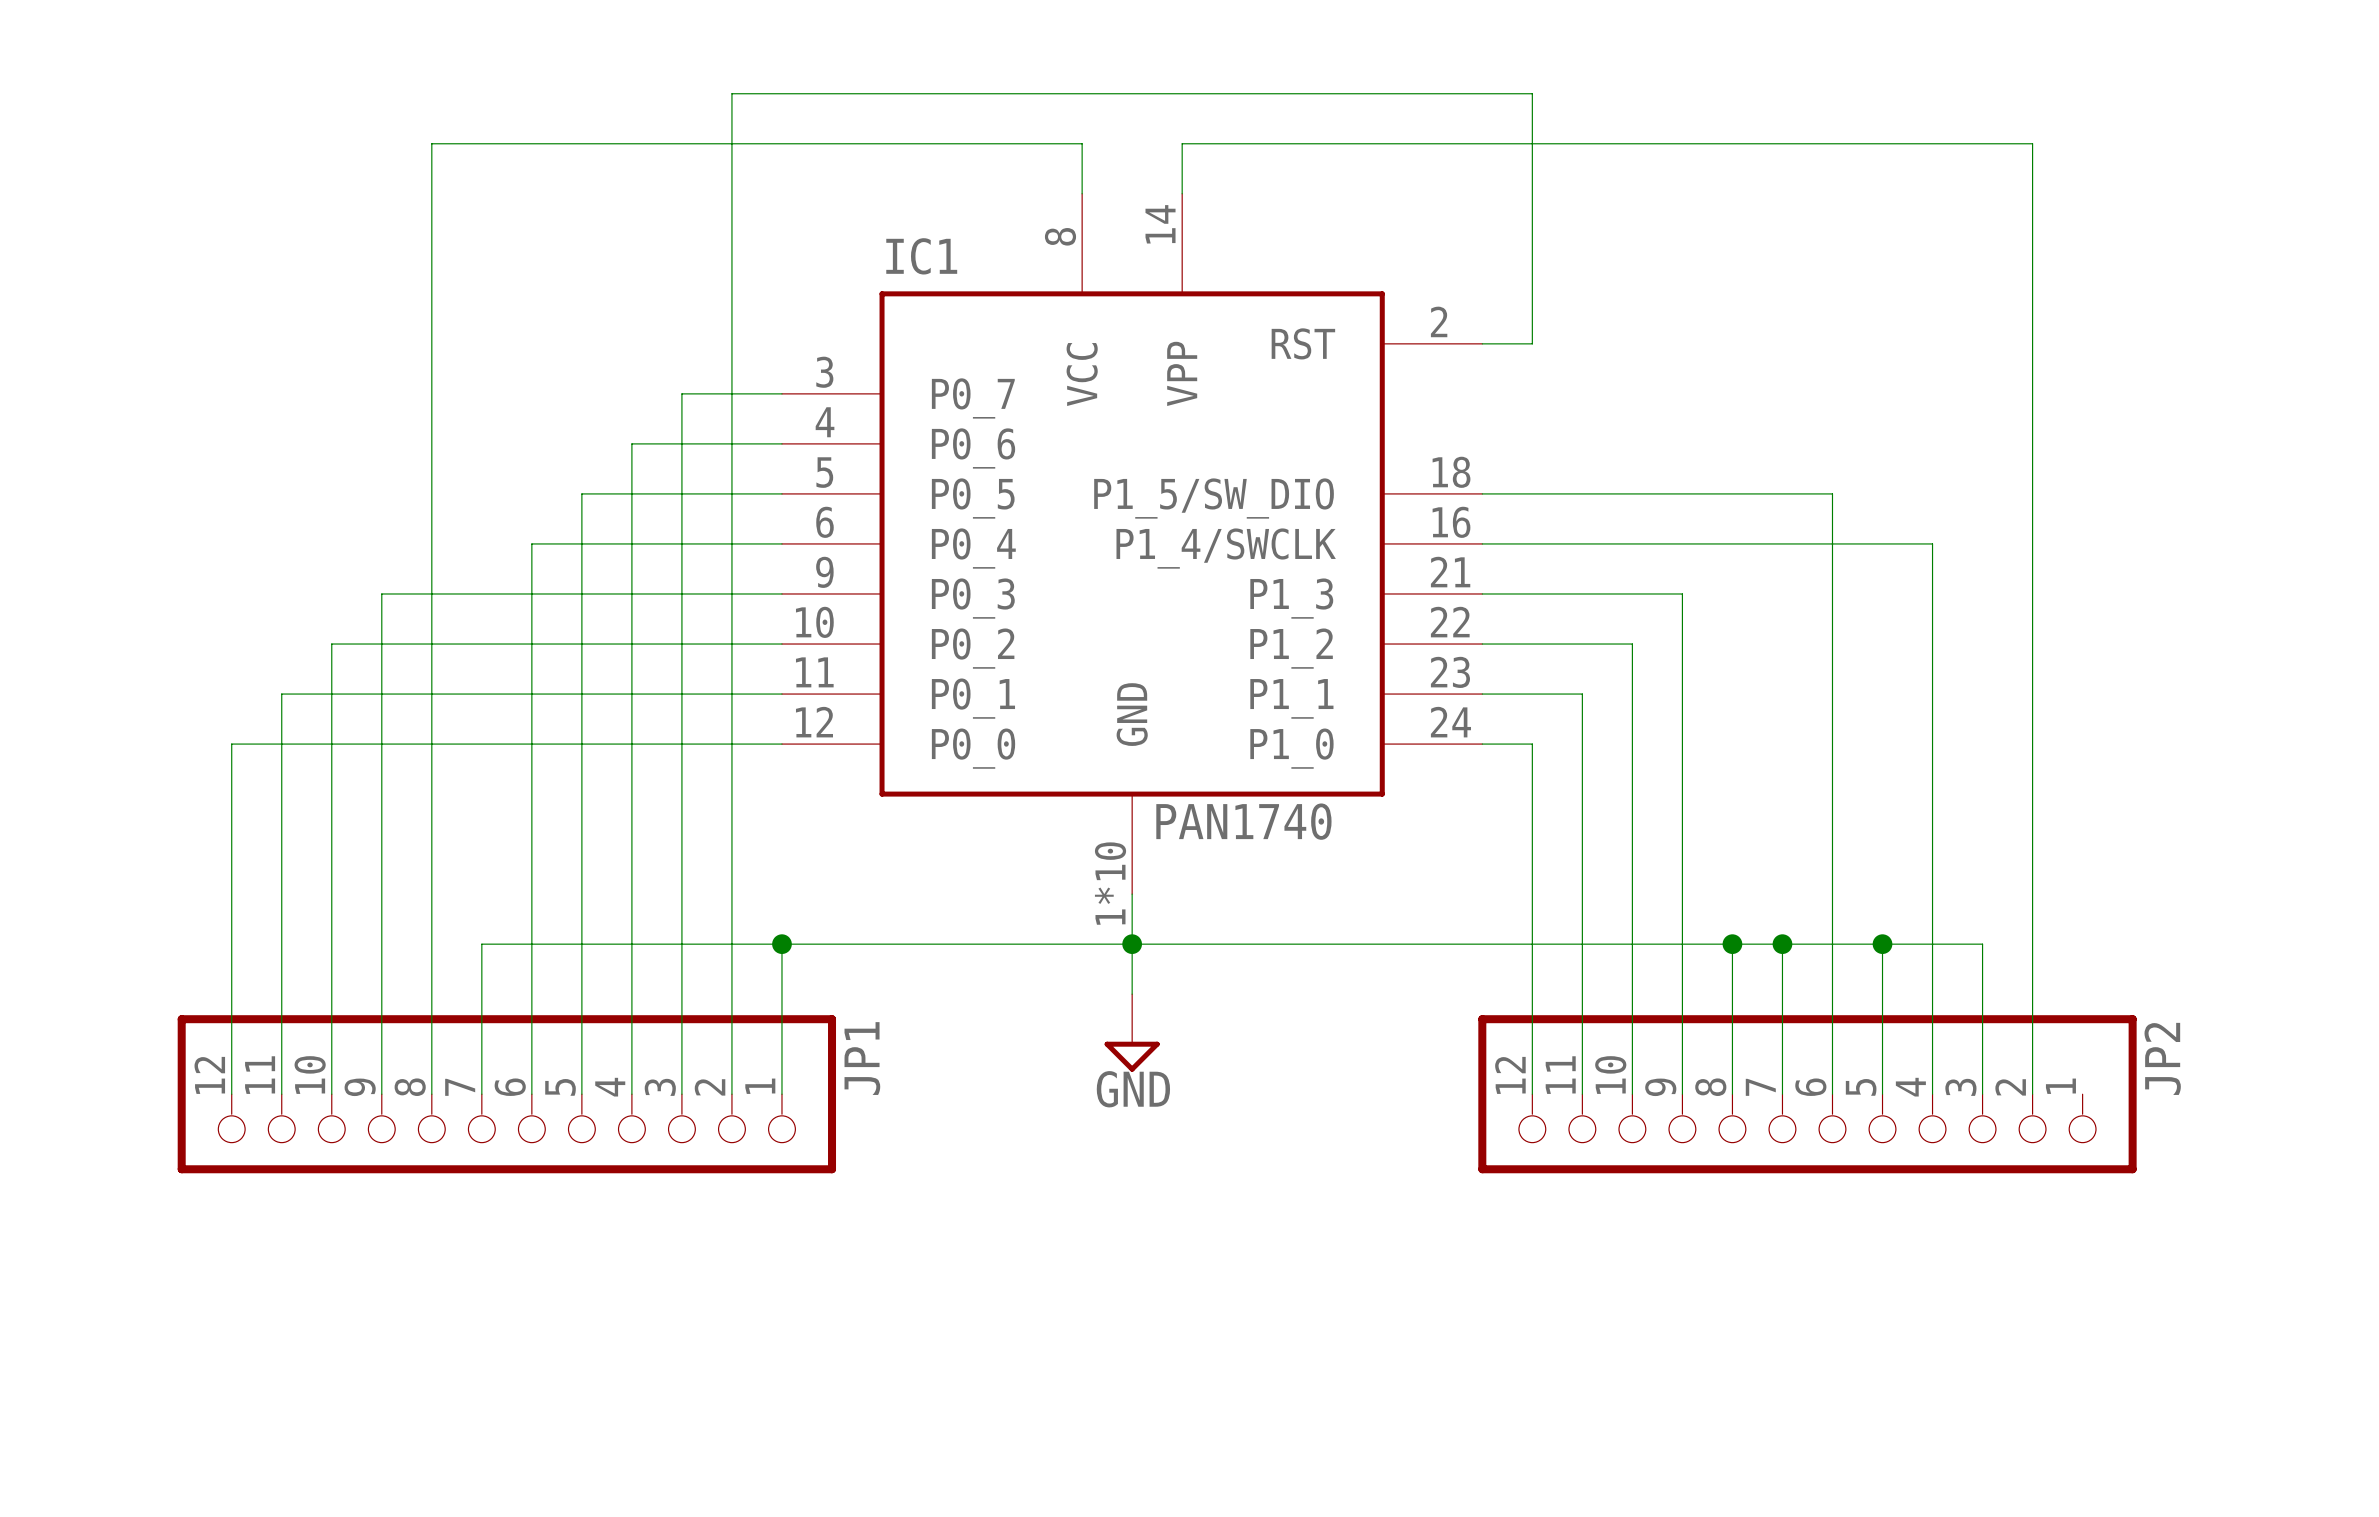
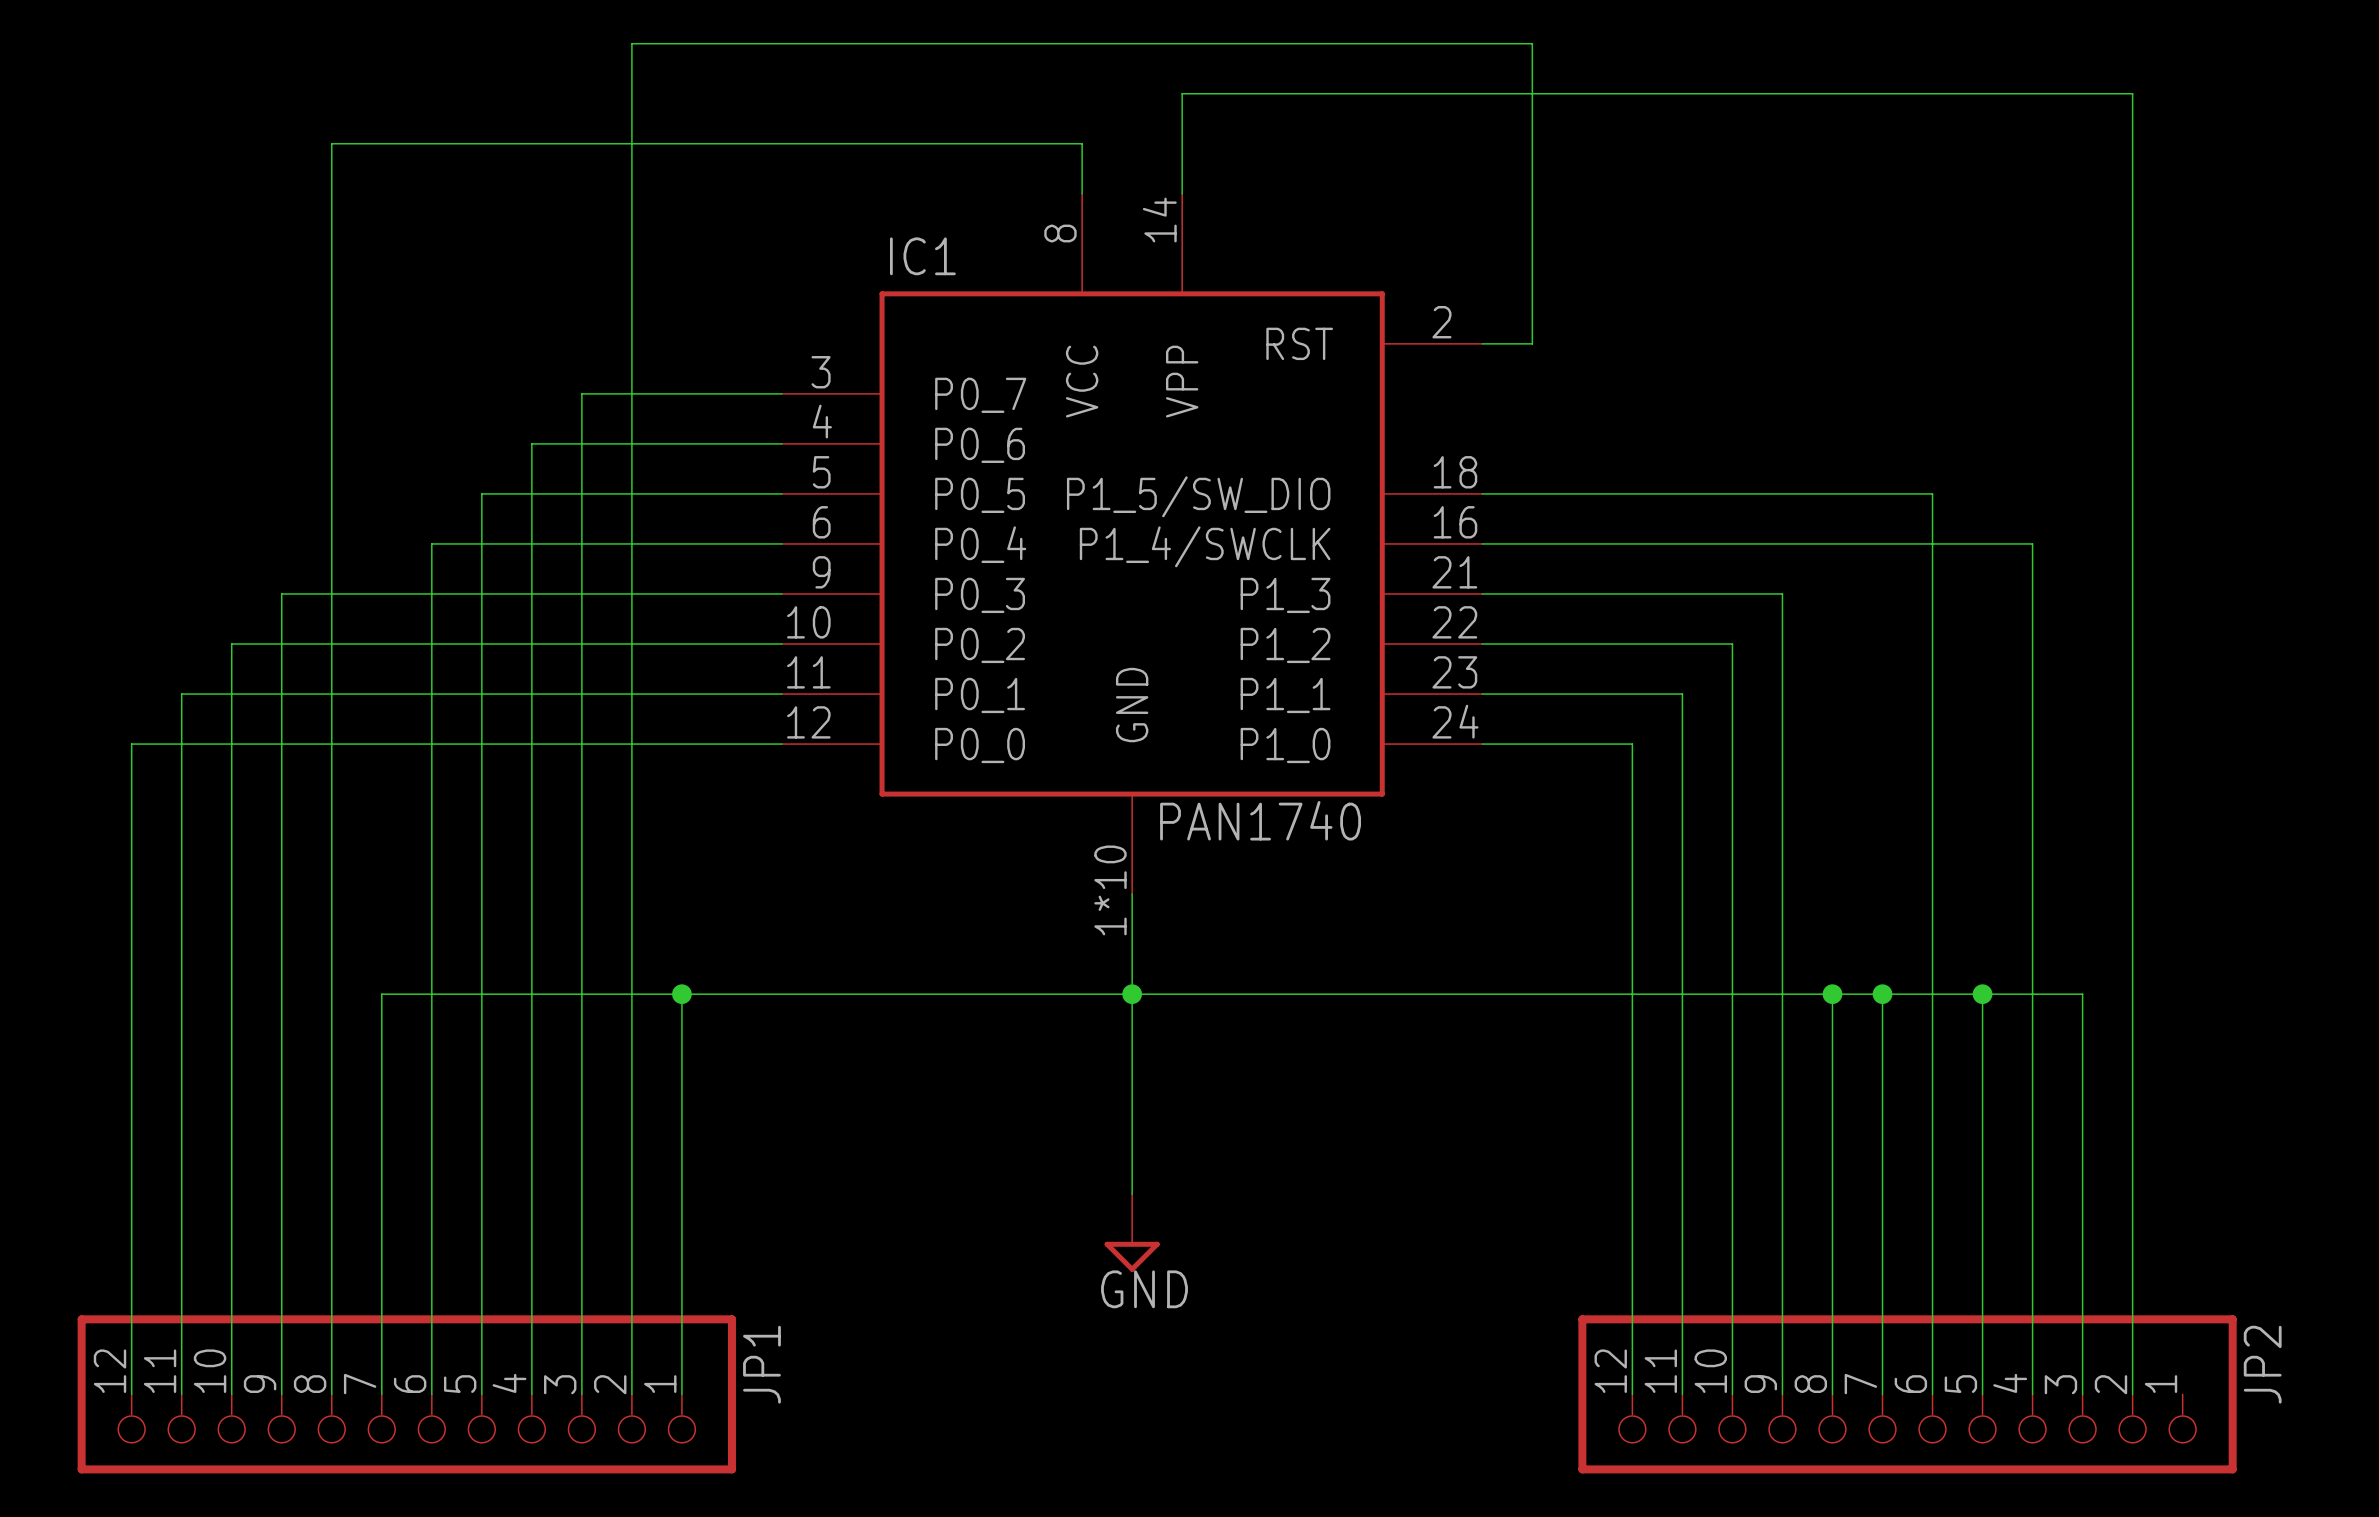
wire: (1182, 93) (731, 93) (731, 1094) -> none
wire: (431, 143) (431, 543) -> (431, 143) (331, 143) (331, 644) (231, 644) (231, 744) (131, 744) (131, 1394)
wire: (1182, 143) (2032, 143) (2032, 543) -> (1182, 143) (1182, 93)
wire: (681, 393) (681, 994) -> (681, 393) (581, 393) (581, 493) (481, 493) (481, 944)
wire: (1832, 493) (1832, 994) -> (1832, 493) (1932, 493) (1932, 543) (2032, 543)
wire: none -> (431, 543) (531, 543) (531, 443) (631, 443) (631, 43) (1532, 43) (1532, 93) (2132, 93) (2132, 1394)
wire: (381, 593) (381, 994) -> (381, 593) (281, 593) (281, 694) (181, 694) (181, 1394)
wire: (1682, 593) (1682, 694) -> (1582, 694) (1682, 694)
wire: none -> (1682, 593) (1782, 593) (1782, 944)
wire: (1632, 644) (1632, 744) -> (1532, 744) (1632, 744)
wire: none -> (1632, 644) (1732, 644) (1732, 944)
wire: (1582, 694) (1582, 1094) -> none
wire: (1532, 744) (1532, 1094) -> none
wire: (481, 944) (1982, 944) (1982, 994) -> none
wire: (781, 944) (781, 1094) -> none
junction position: (781, 944) -> (681, 994)
junction position: (1132, 944) -> (1132, 994)
junction: (1732, 944) -> none
junction: (1782, 944) -> none
wire: (1882, 944) (1882, 994) -> none
junction: (1882, 944) -> none
wire: none -> (381, 994) (2082, 994) (2082, 1394)
wire: none -> (1132, 994) (1132, 1194)
junction: none -> (1832, 994)
junction: none -> (1882, 994)
junction: none -> (1982, 994)
power symbol position: GND (1132, 1032) -> GND (1132, 1233)
wire: none -> (231, 1094) (231, 1394)
wire: none -> (281, 1094) (281, 1394)
wire: none -> (331, 1094) (331, 1394)
wire: none -> (381, 1094) (381, 1394)
wire: none -> (431, 1094) (431, 1394)
wire: none -> (481, 1094) (481, 1394)
JP1 position: (506, 1094) -> (406, 1394)
wire: none -> (531, 1094) (531, 1394)
wire: none -> (581, 1094) (581, 1394)
wire: none -> (631, 1094) (631, 1394)
wire: none -> (681, 1094) (681, 1394)
wire: none -> (1632, 1094) (1632, 1394)
wire: none -> (1682, 1094) (1682, 1394)
wire: none -> (1732, 1094) (1732, 1394)
wire: none -> (1782, 1094) (1782, 1394)
JP2 position: (1807, 1094) -> (1907, 1394)
wire: none -> (1832, 1094) (1832, 1394)
wire: none -> (1882, 1094) (1882, 1394)
wire: none -> (1932, 1094) (1932, 1394)
wire: none -> (1982, 1094) (1982, 1394)
wire: none -> (2032, 1094) (2032, 1394)

